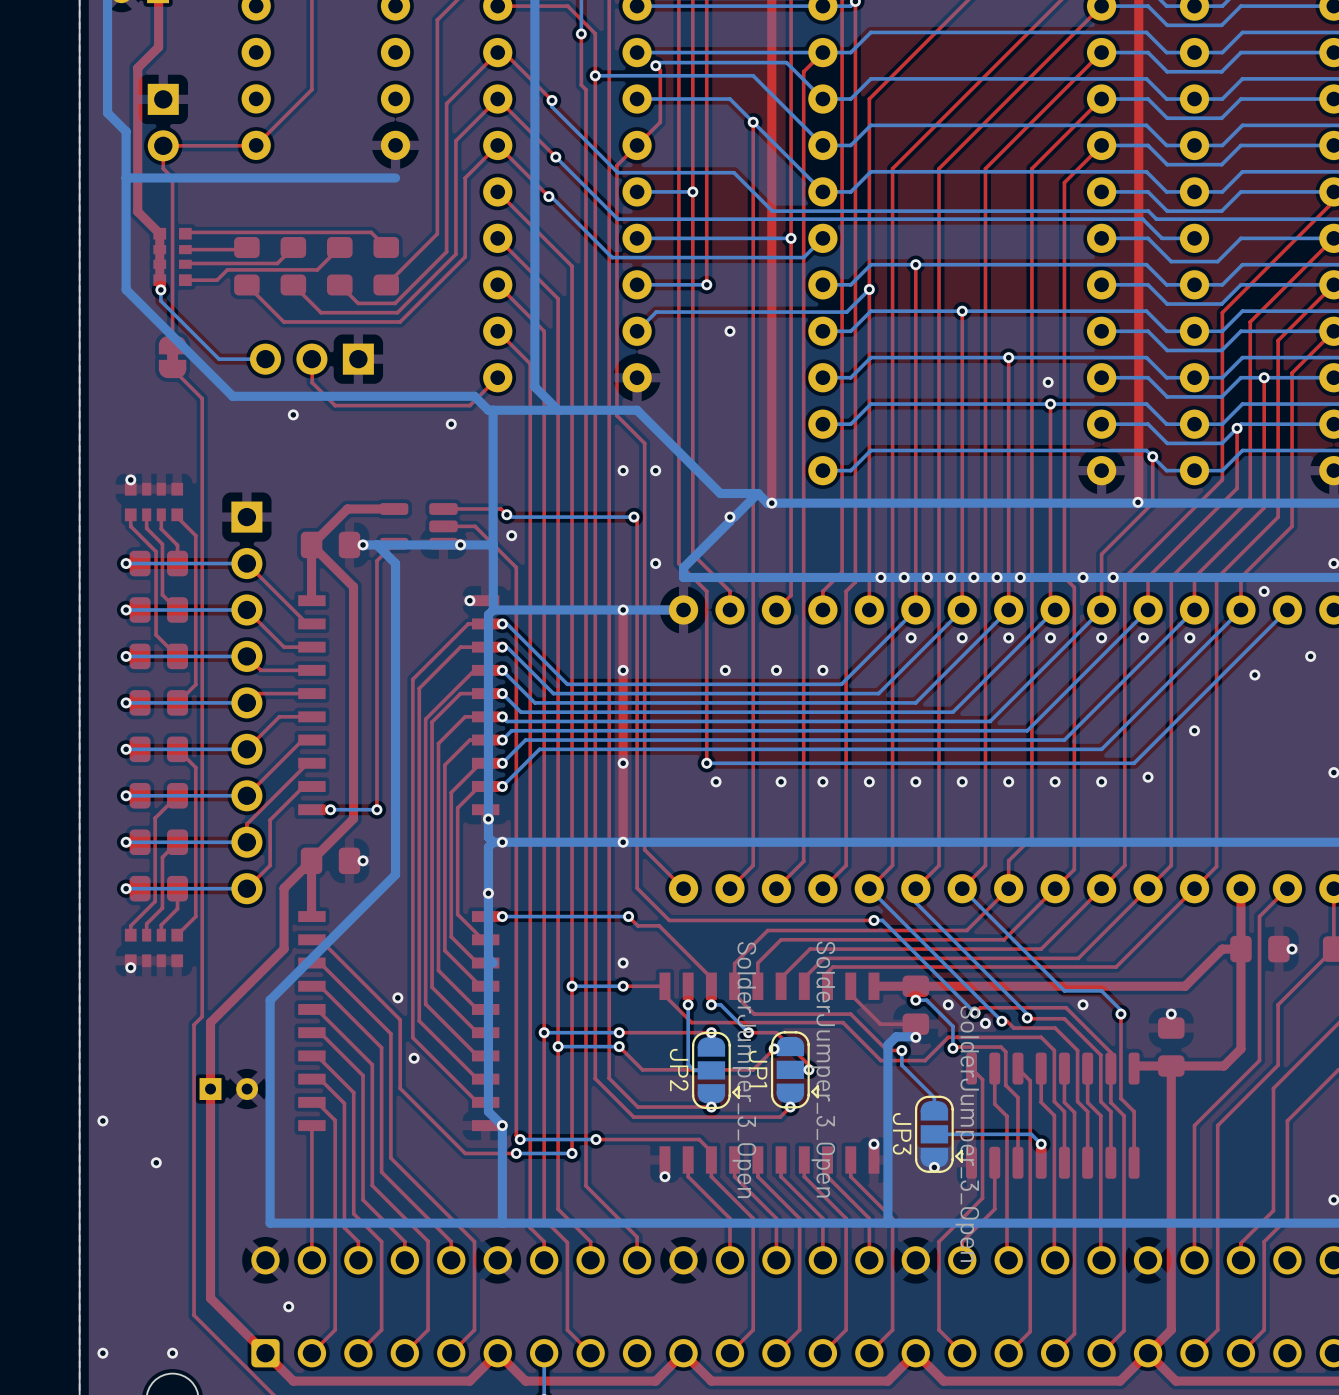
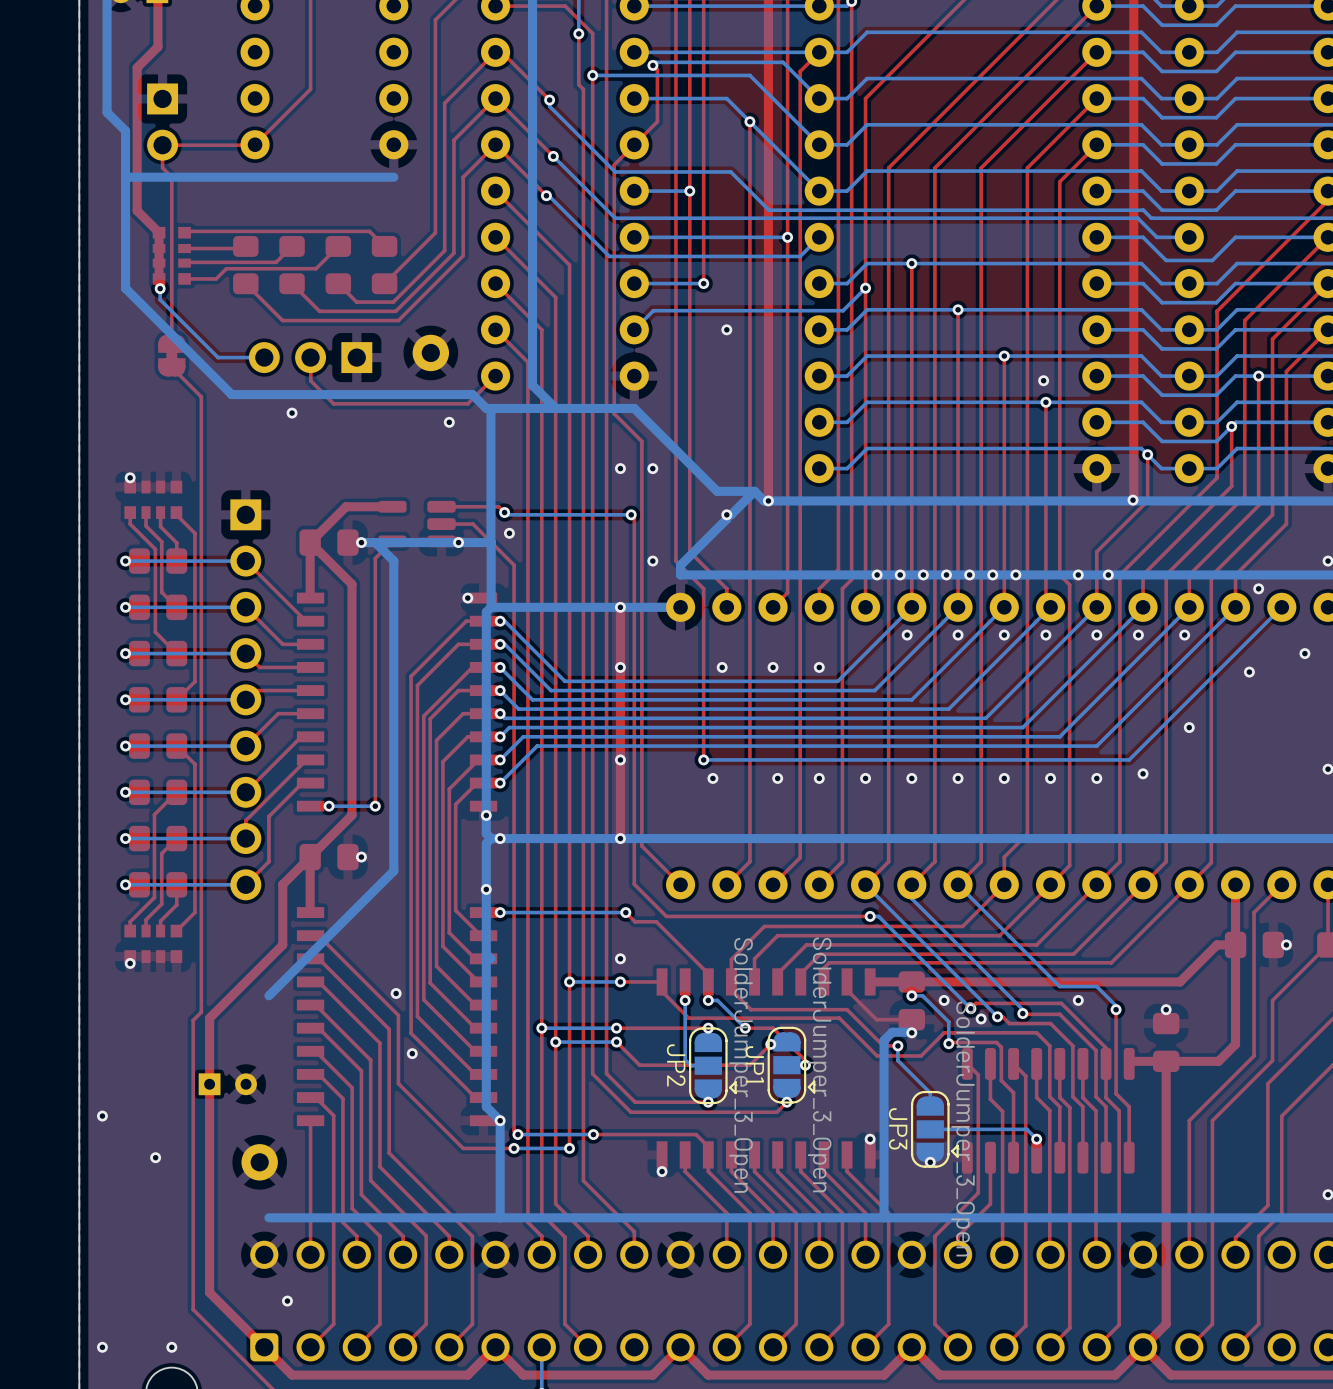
part: none -> (430, 352)
bottom track: (270, 1000) (270, 1223) -> none
part: none -> (259, 1162)

